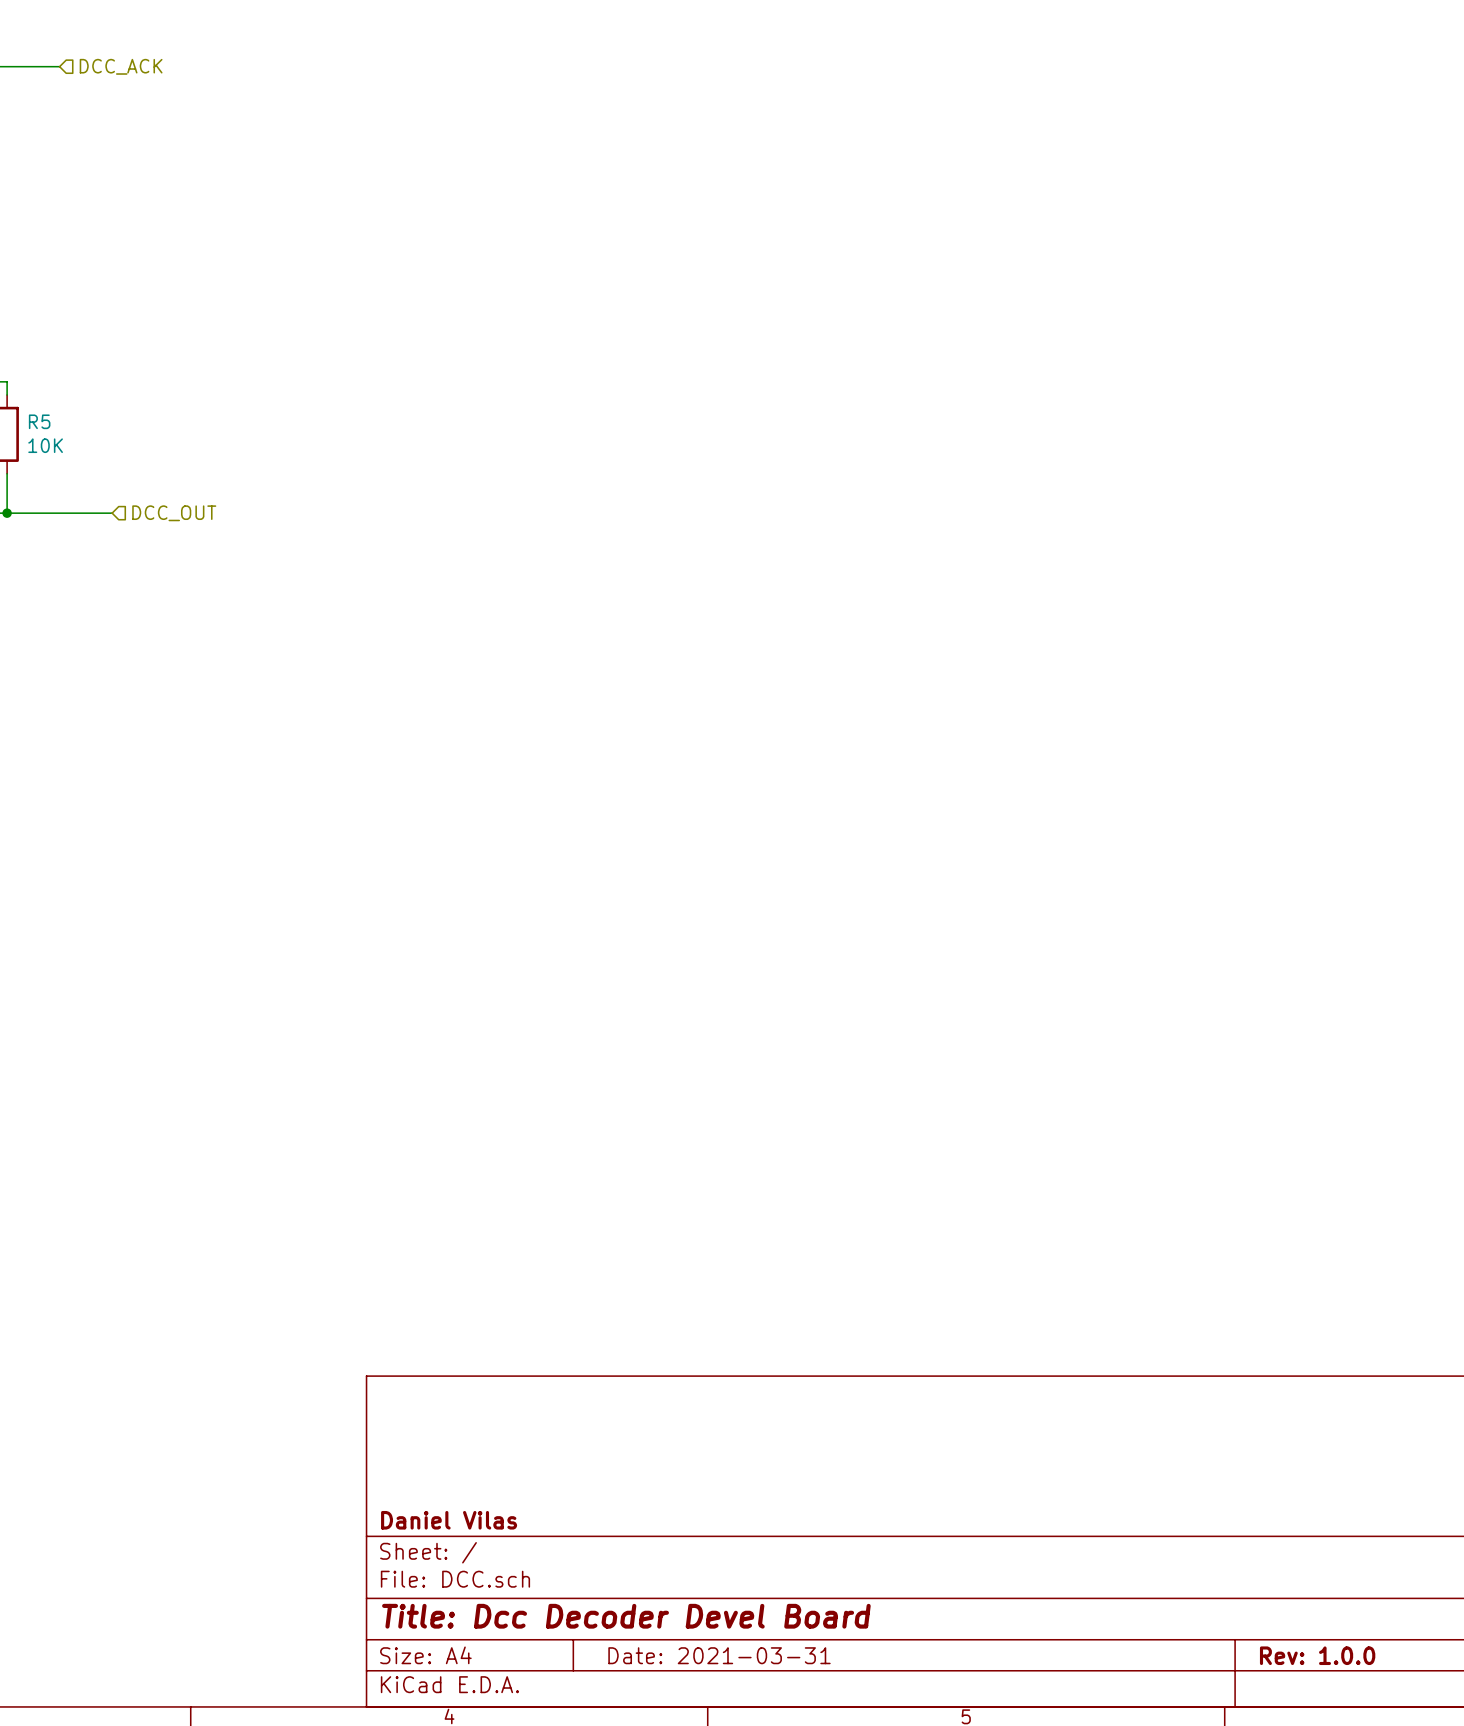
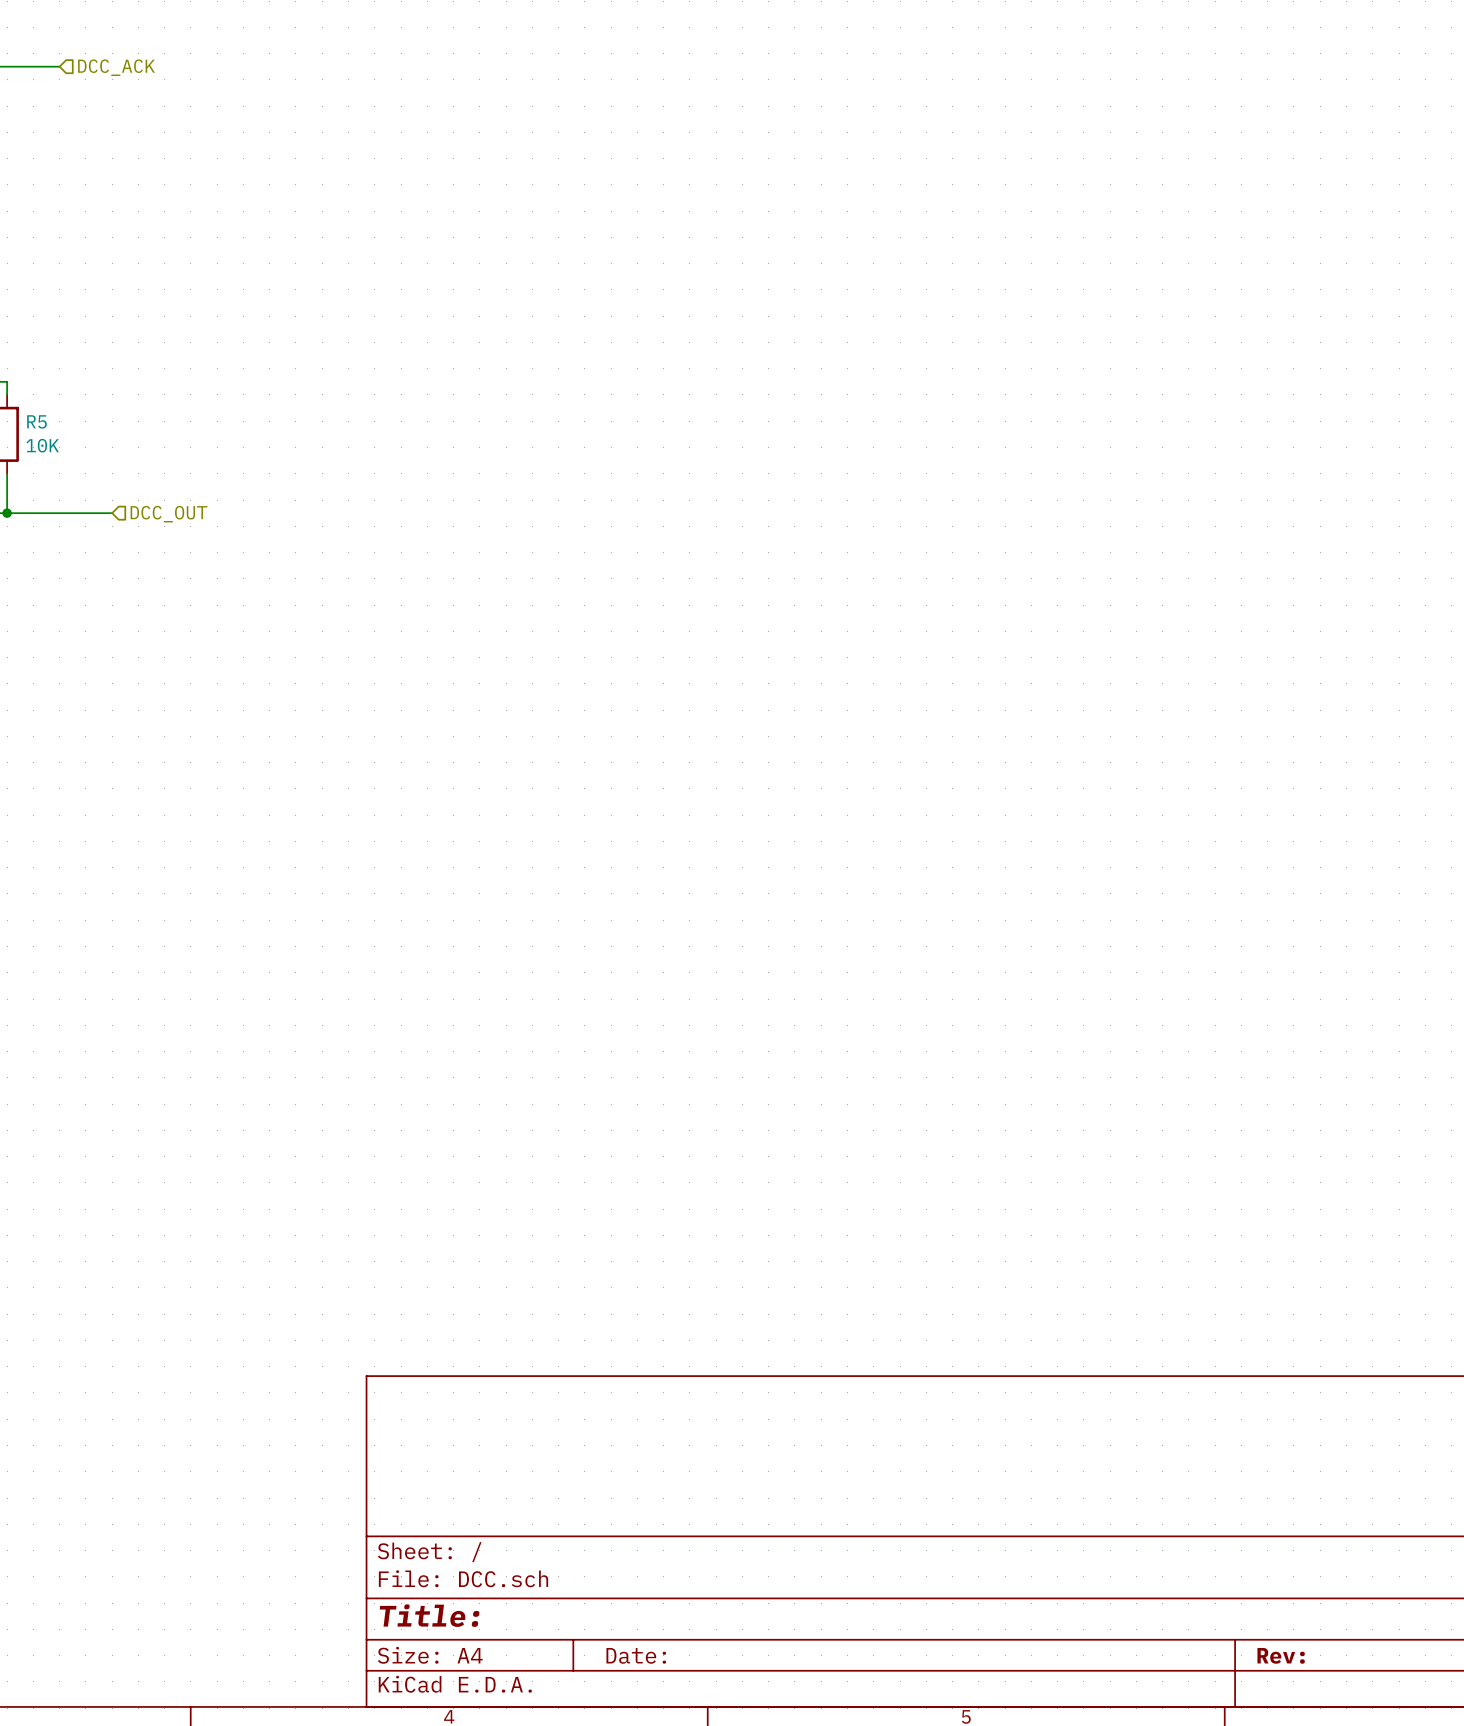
title block: Daniel Vilas (449, 1520) -> none
title block: Title: Dcc Decoder Devel Board (626, 1616) -> Title: (429, 1615)
title block: Date: 2021-03-31 (719, 1655) -> Date: (636, 1655)
title block: Rev: 1.0.0 (1317, 1655) -> Rev: (1281, 1655)

